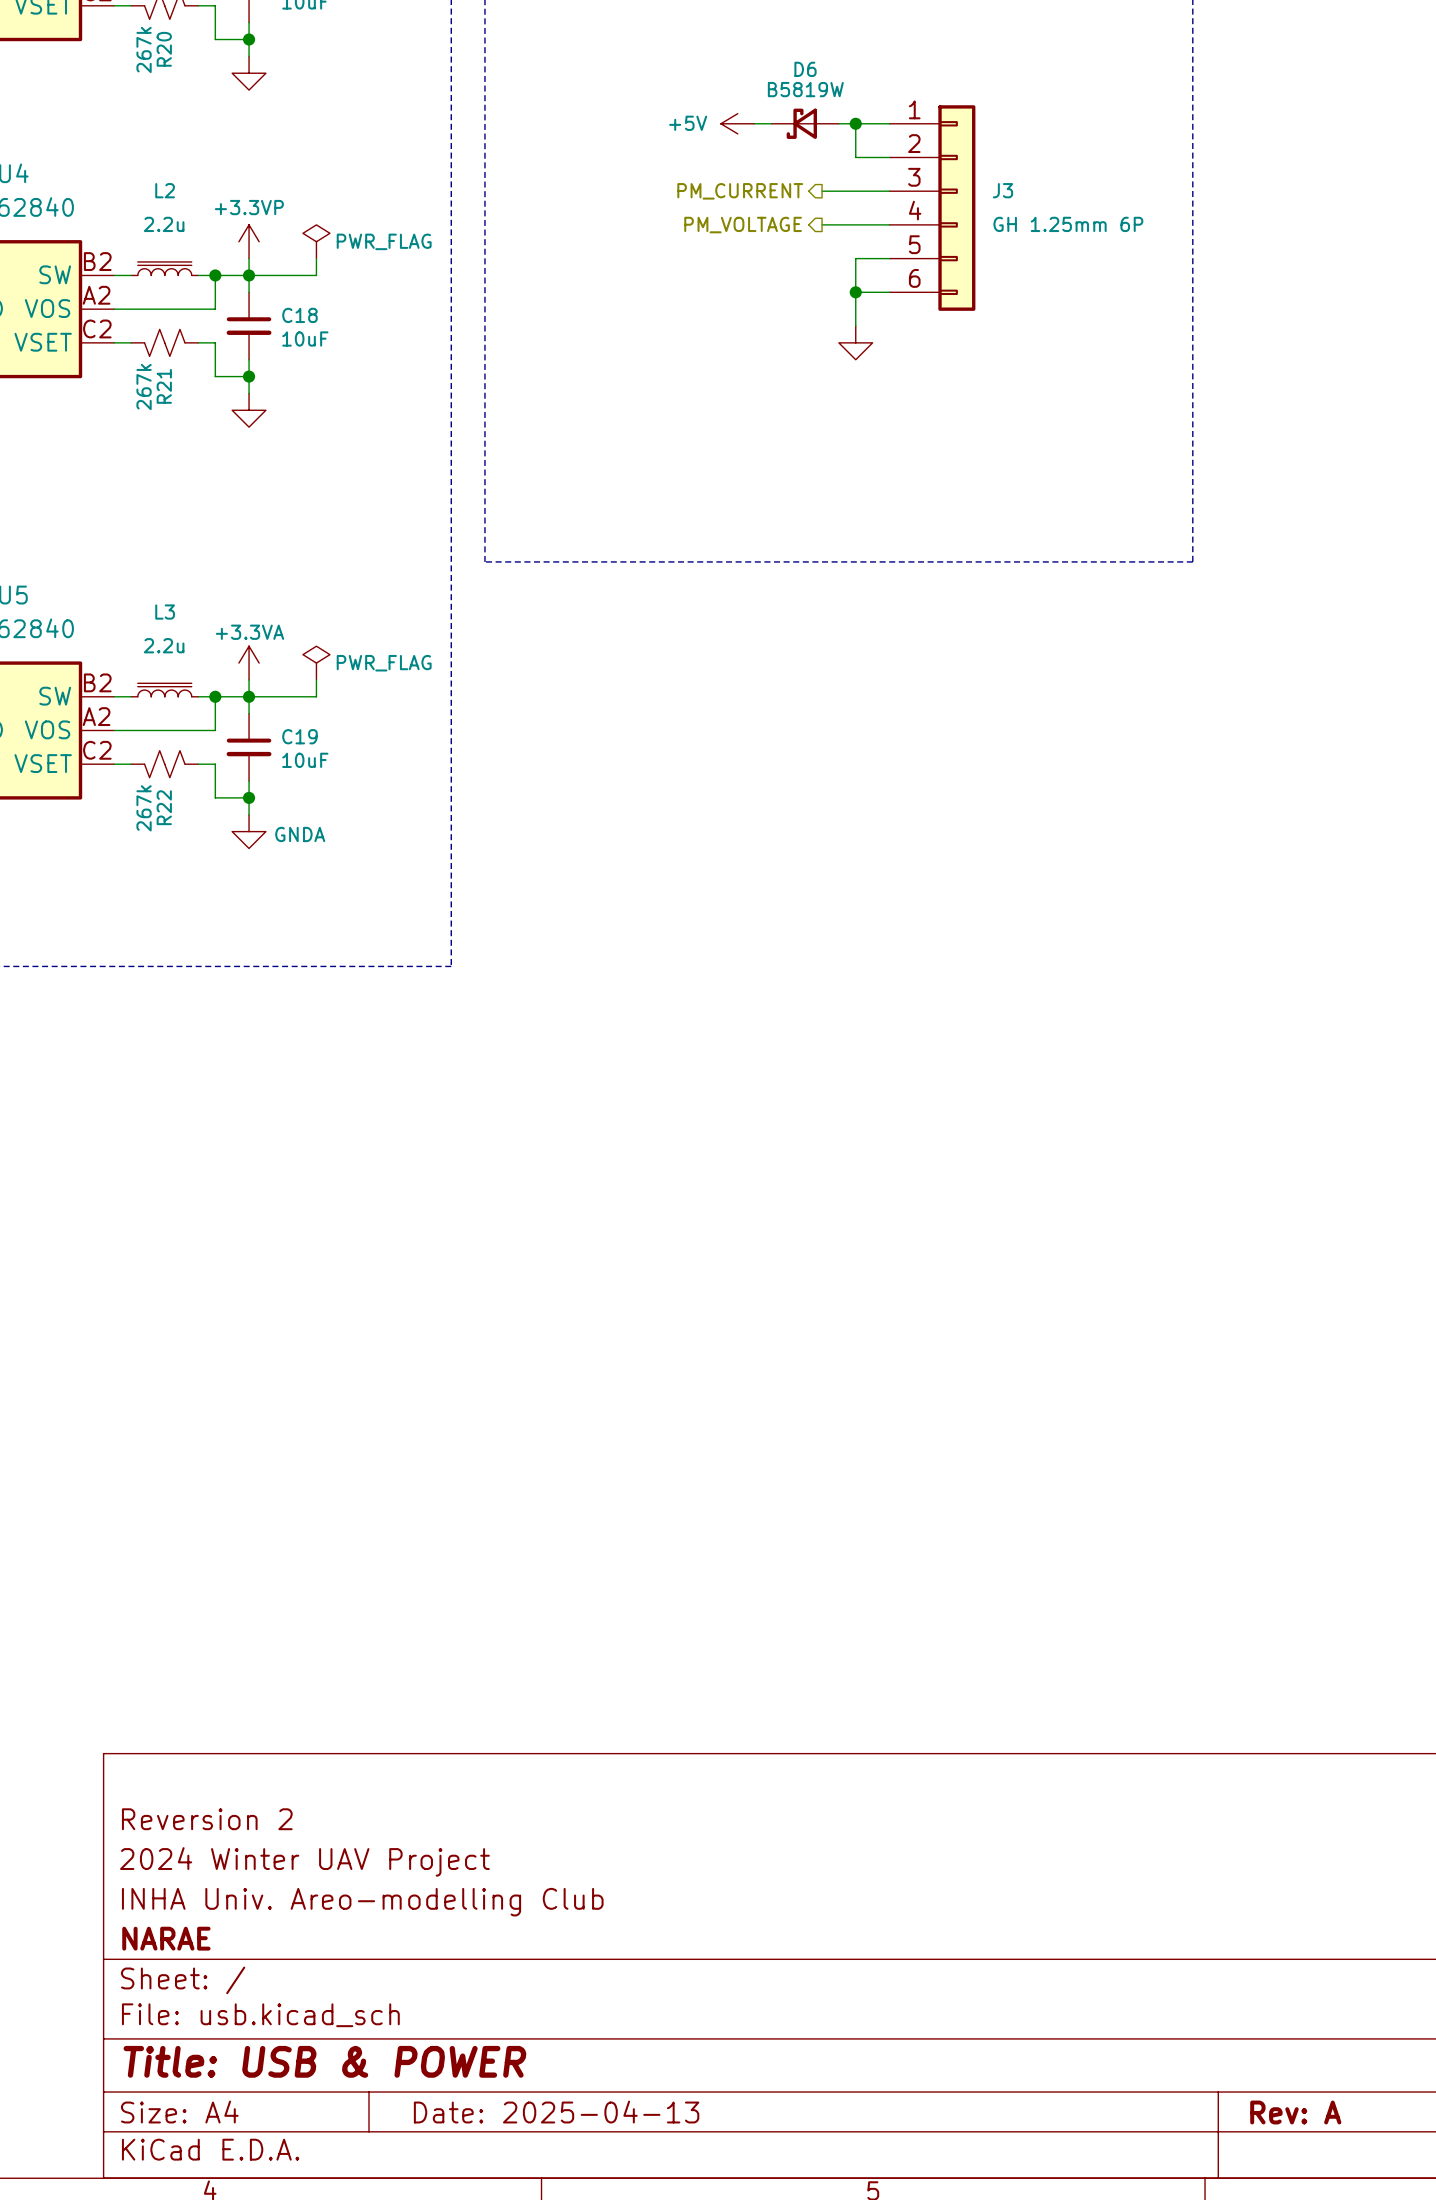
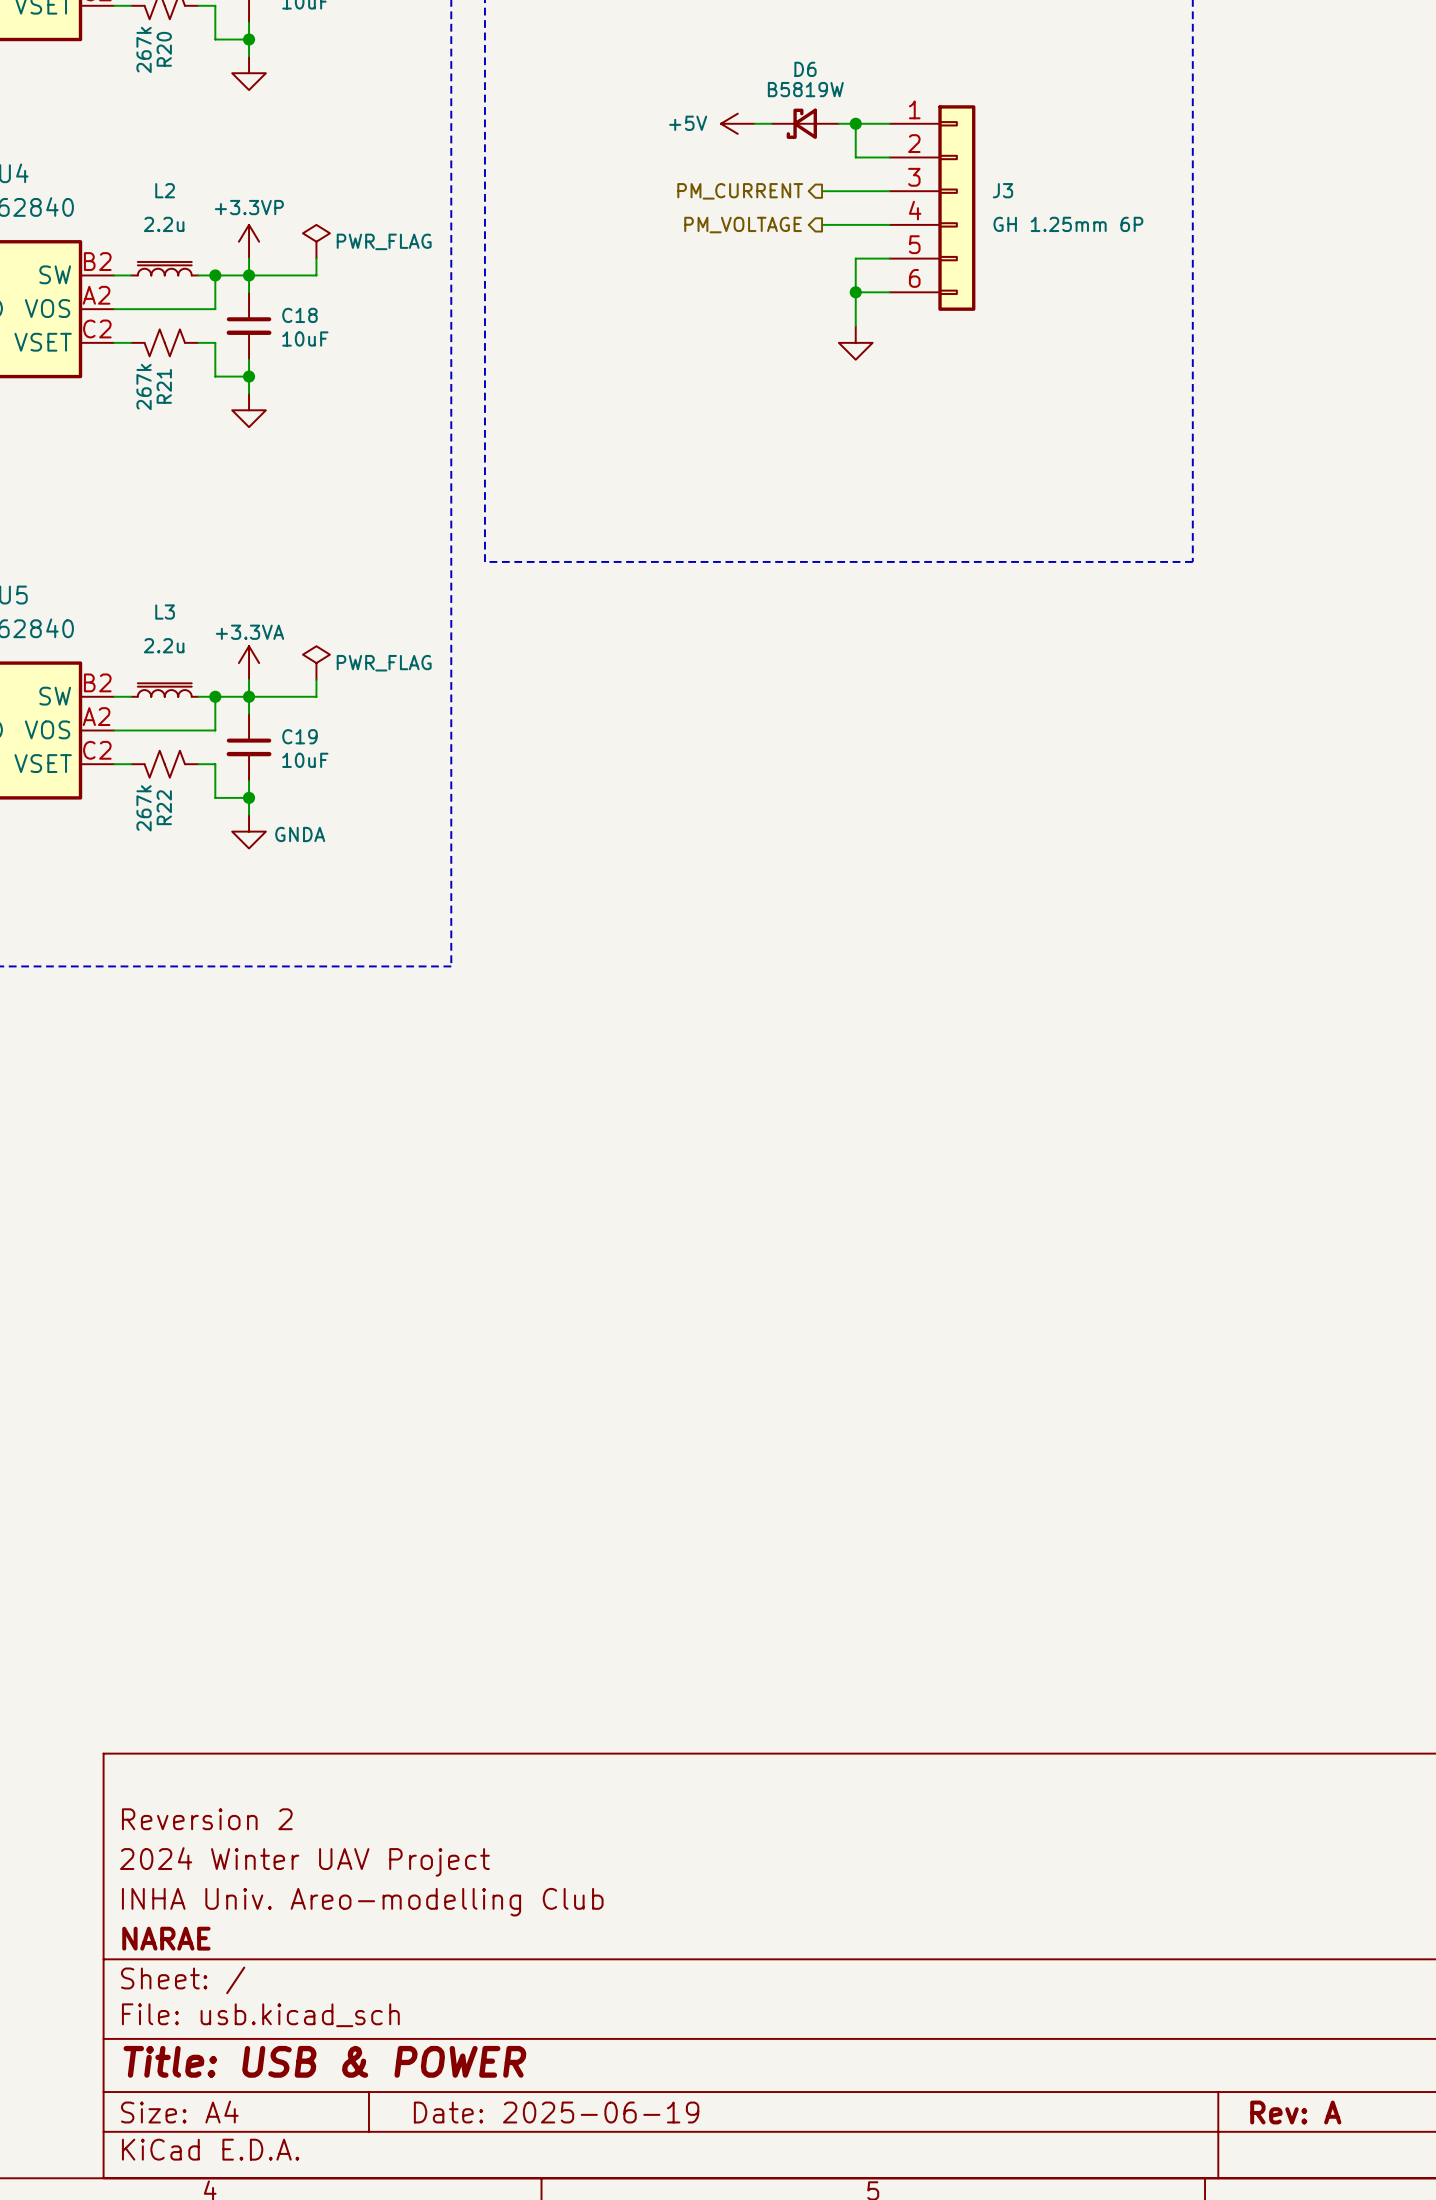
title block: Date: 2025-04-13 (556, 2112) -> Date: 2025-06-19 (556, 2112)

